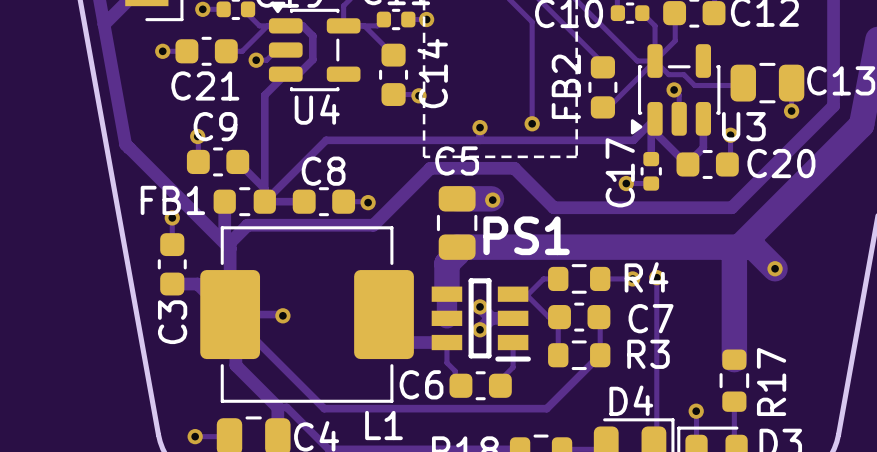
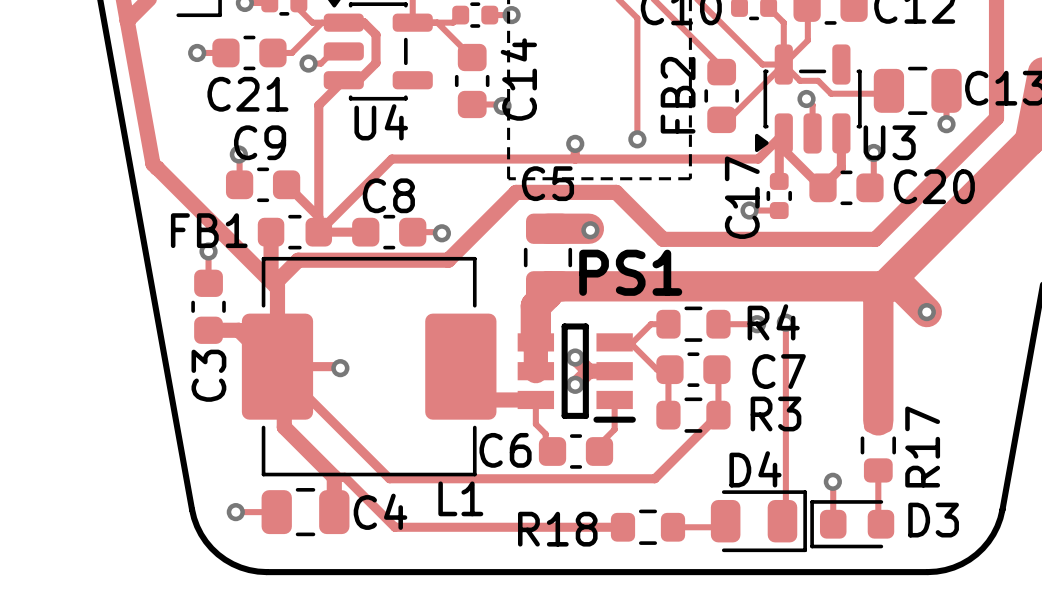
L1 footprint: [200, 226, 414, 403] -> [241, 256, 497, 477]

